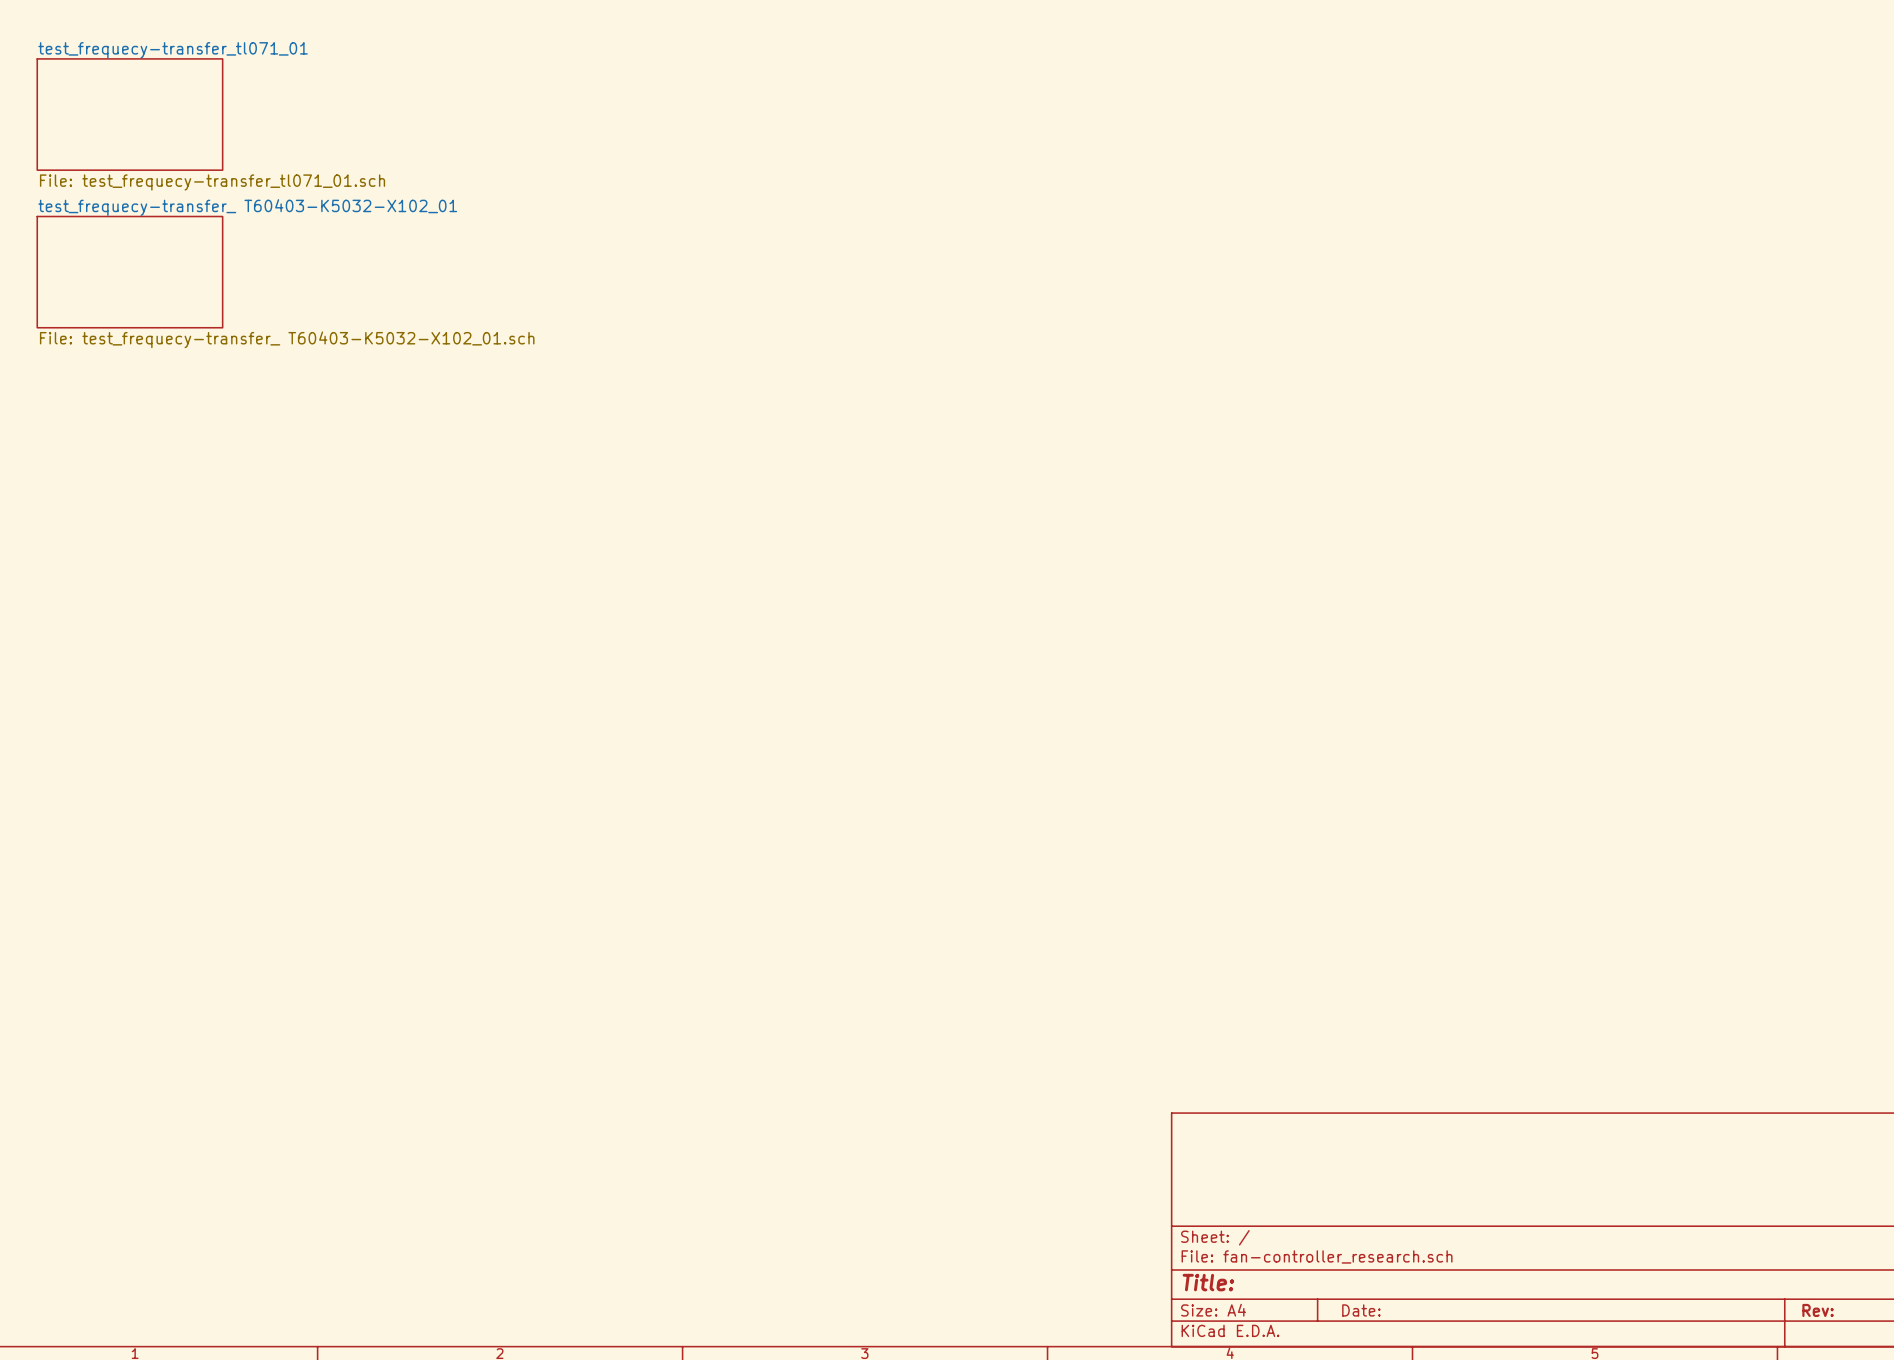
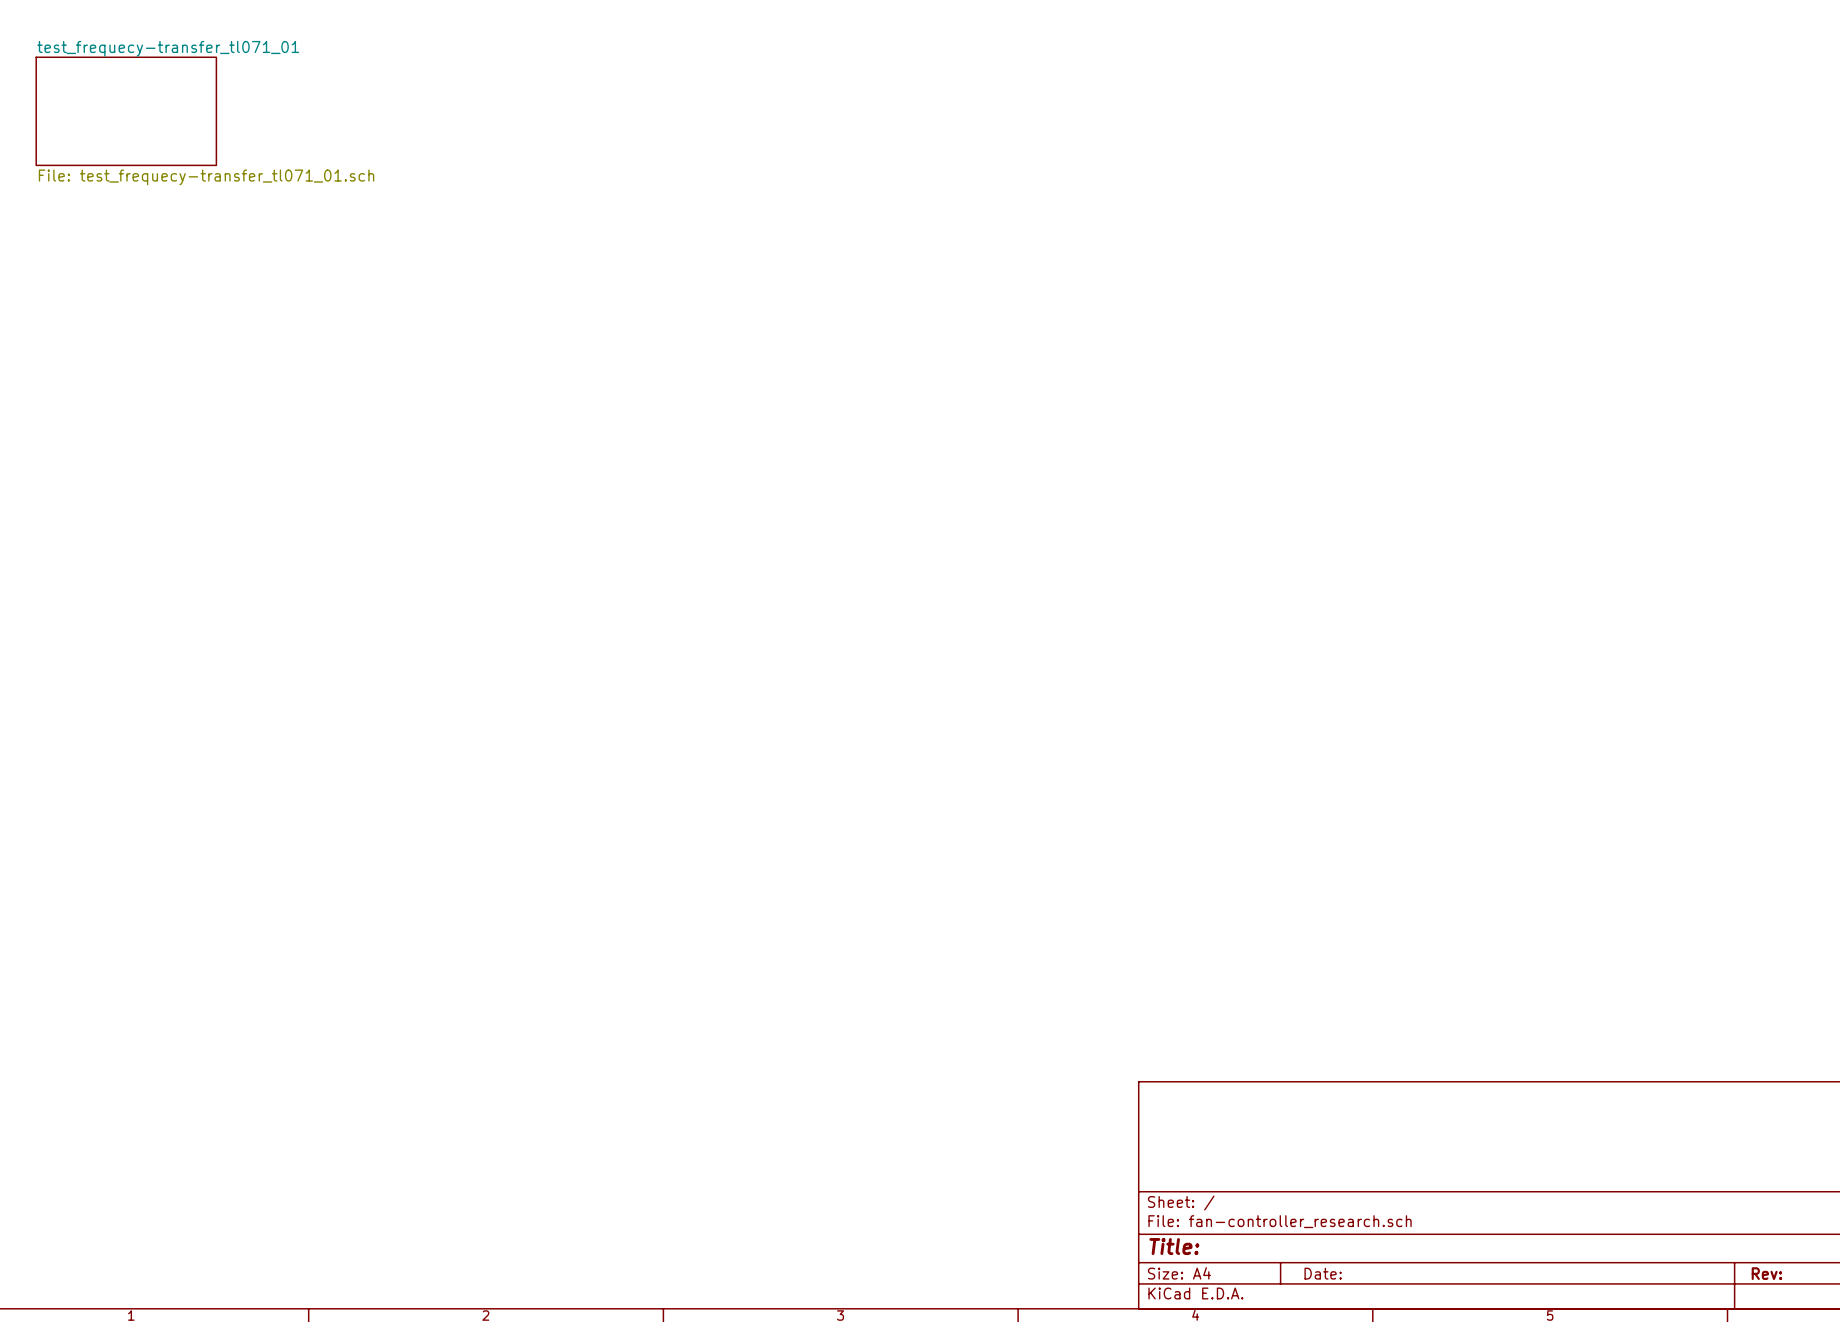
sheet test_frequecy-transfer_ T60403-K5032-X102_01: File: test_frequecy-transfer_ T60403-K5032-X102_01.sch (129, 272) -> none

